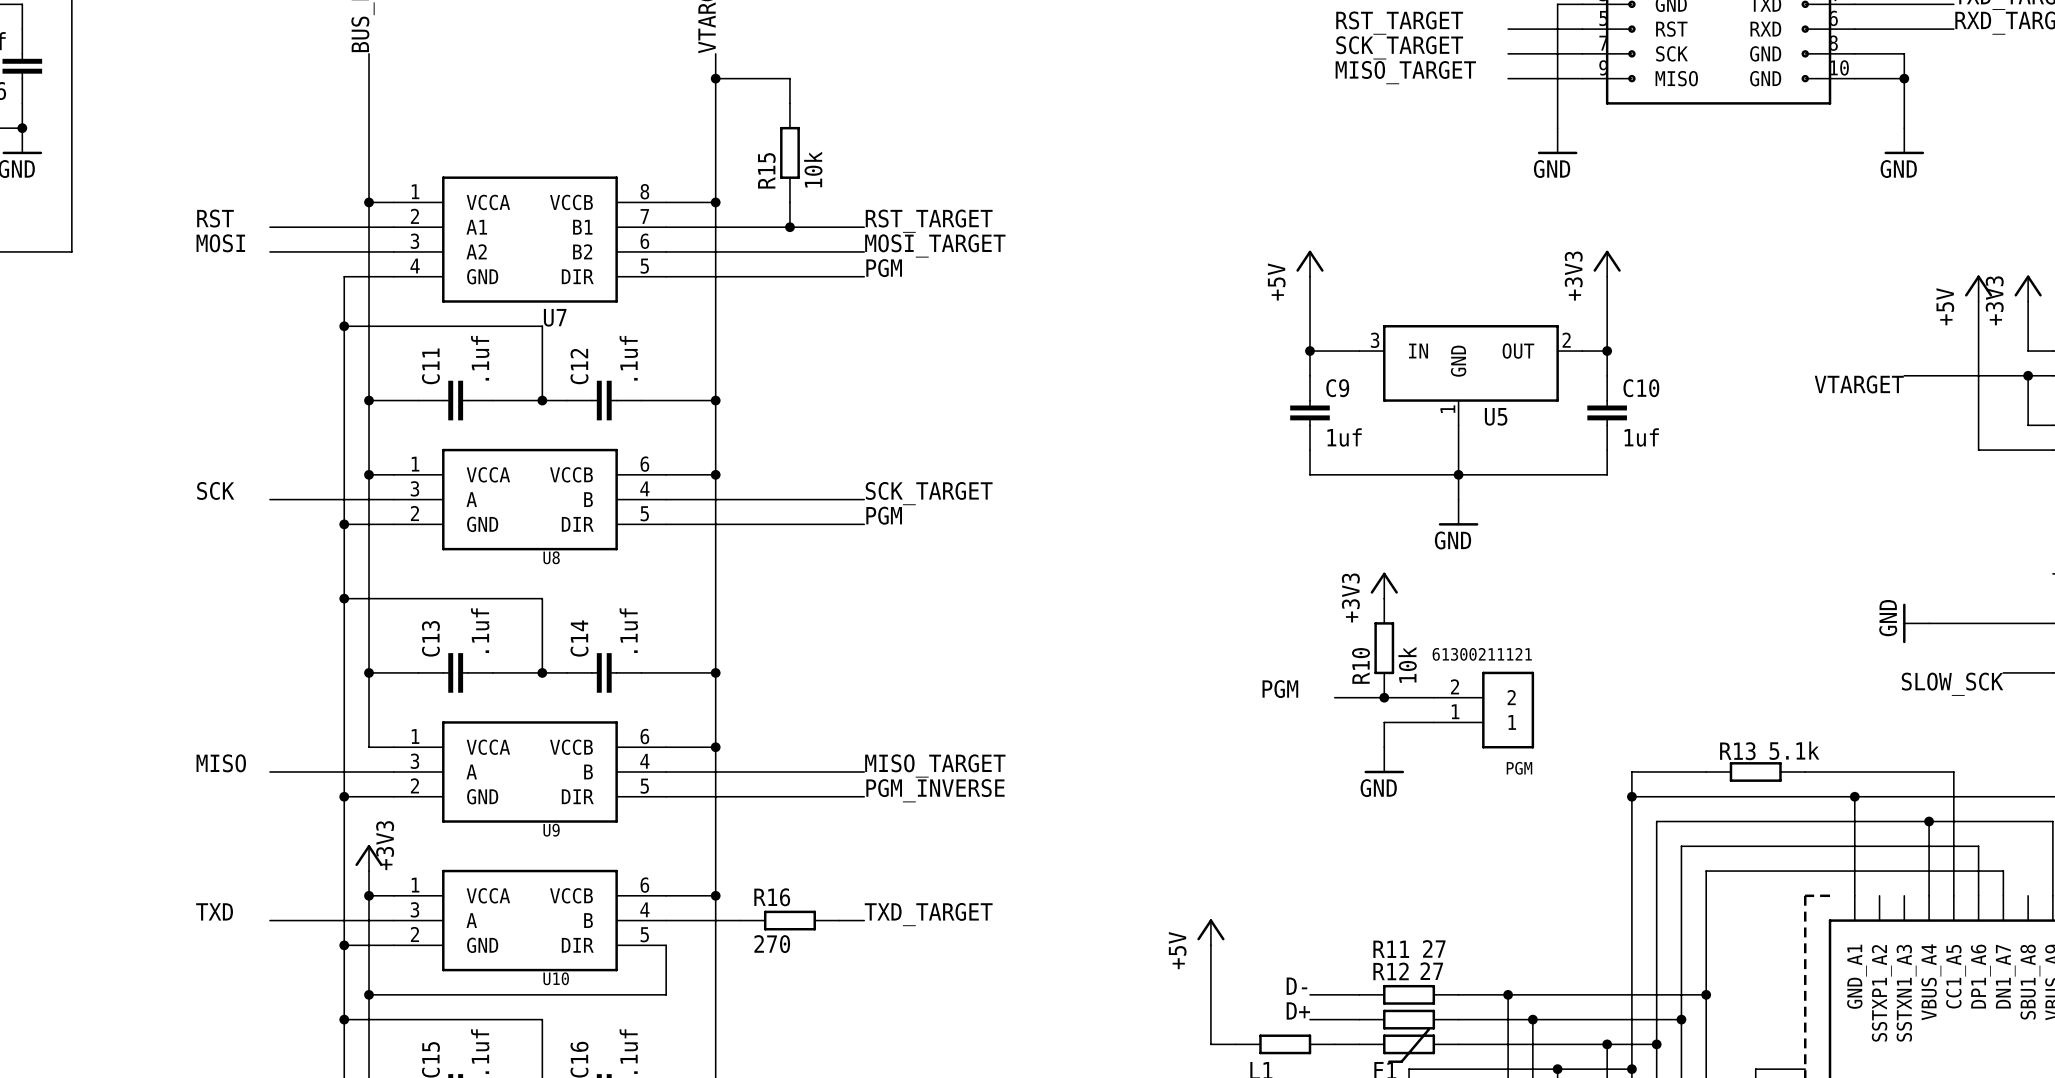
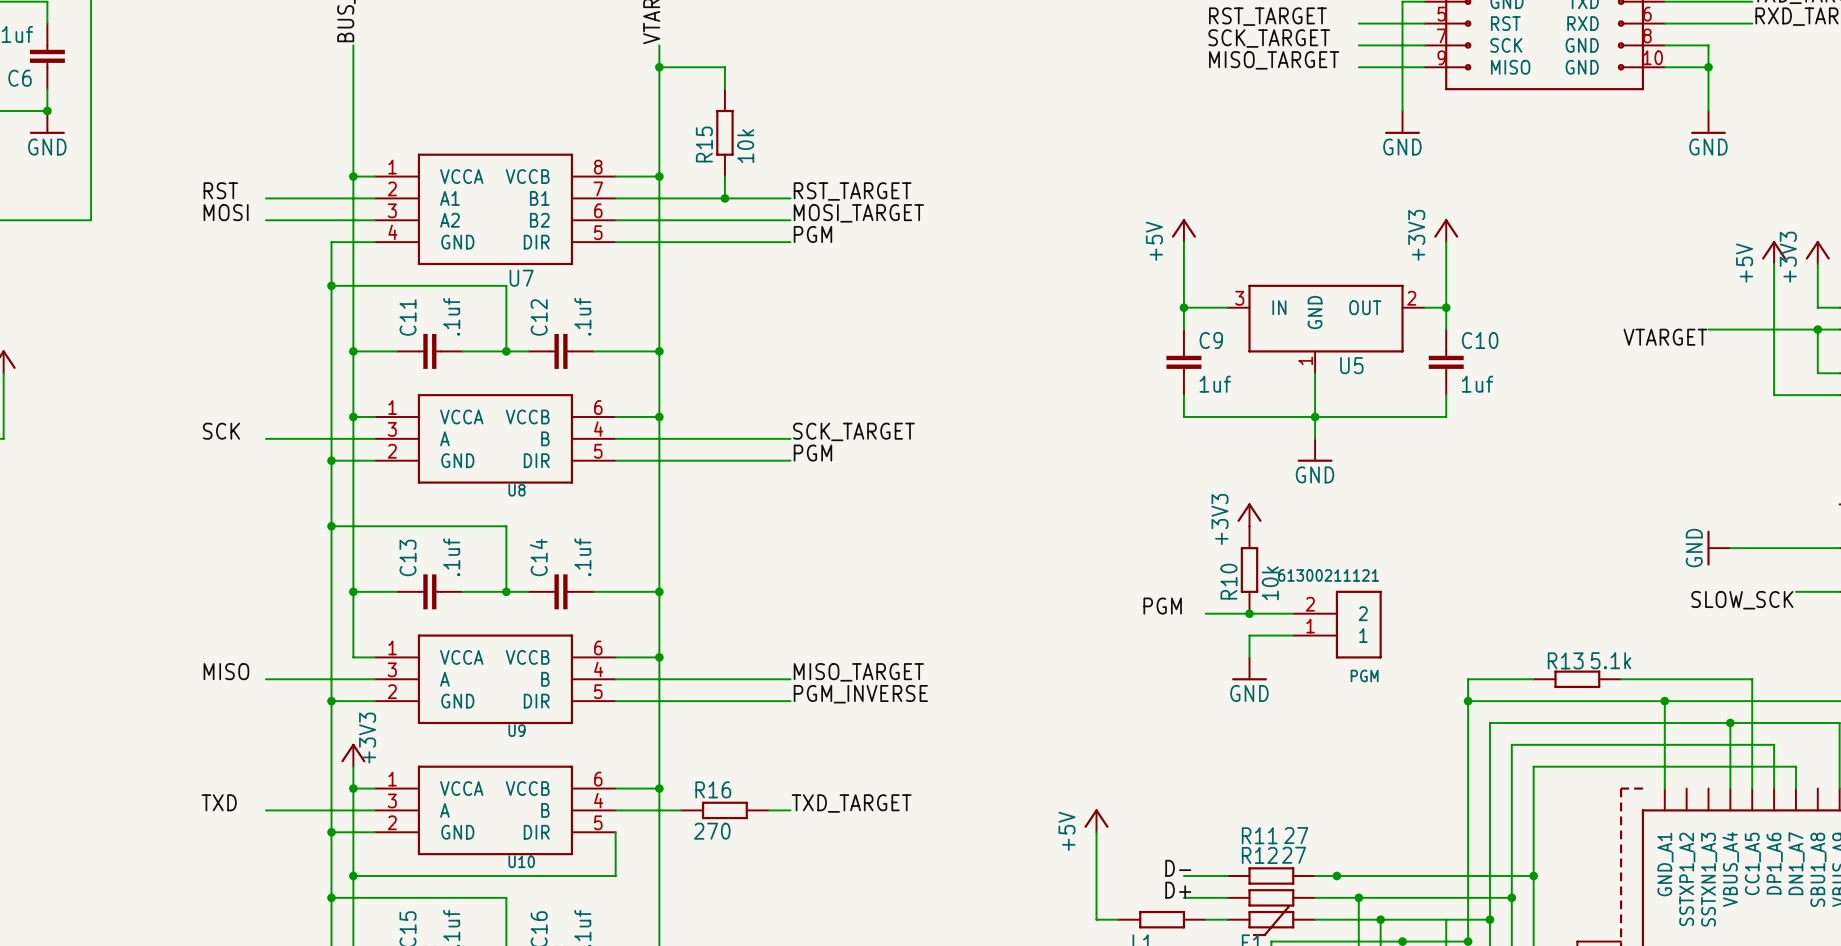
junction: none -> (1336, 875)
wire: (1508, 994) (1508, 1019) -> none
junction: (1508, 994) -> none
junction: none -> (1358, 897)
wire: (1532, 1019) (1532, 1044) -> none
junction: (1532, 1019) -> none
junction: none -> (1380, 919)
junction: (1607, 1044) -> none

